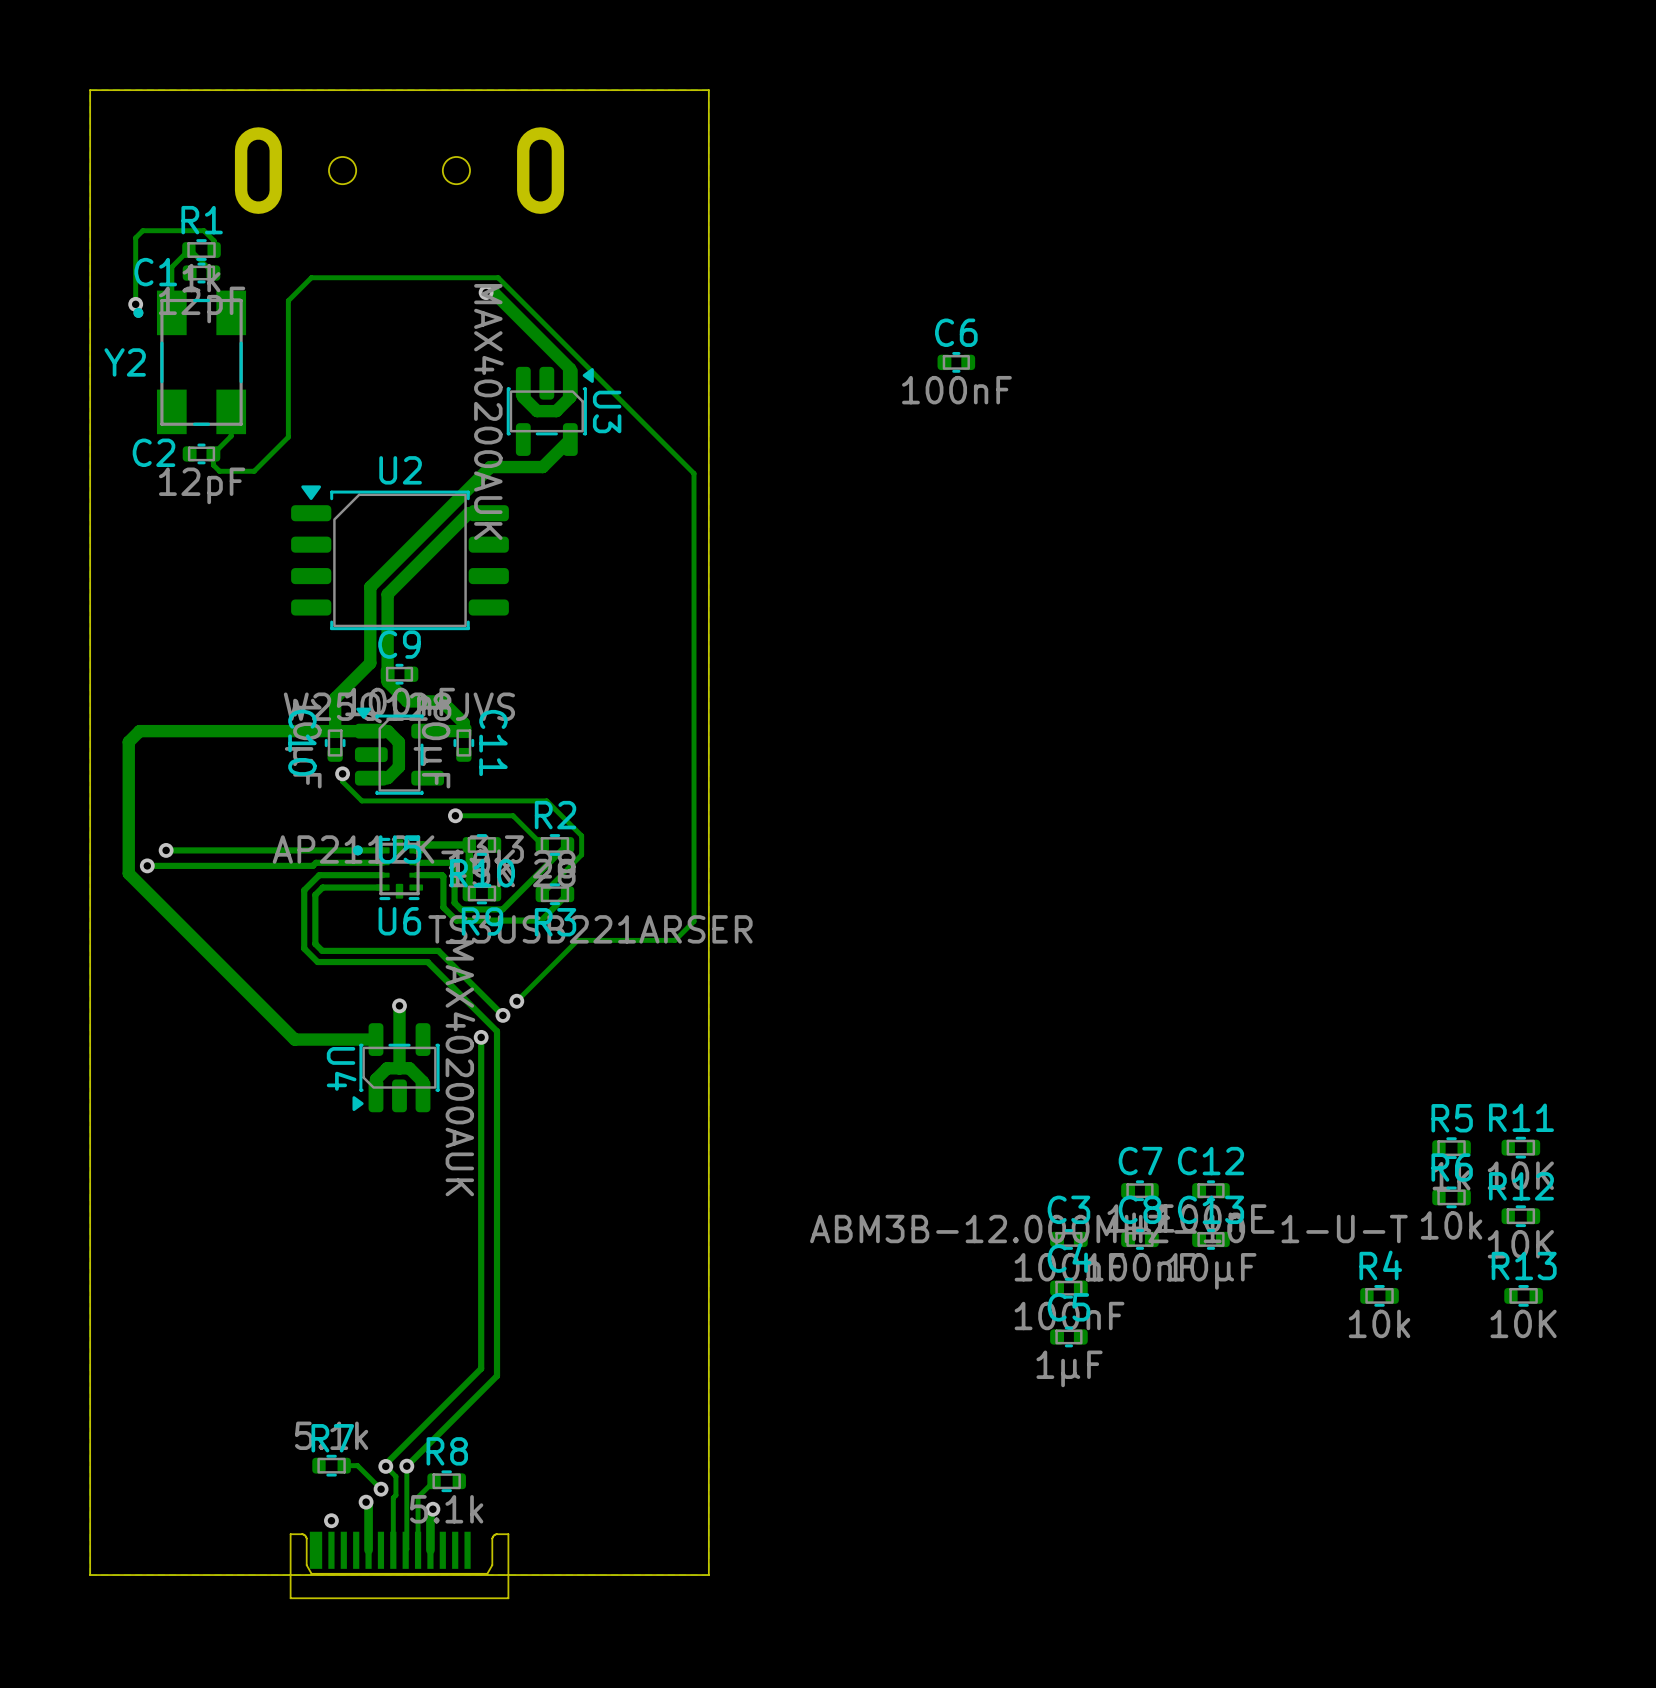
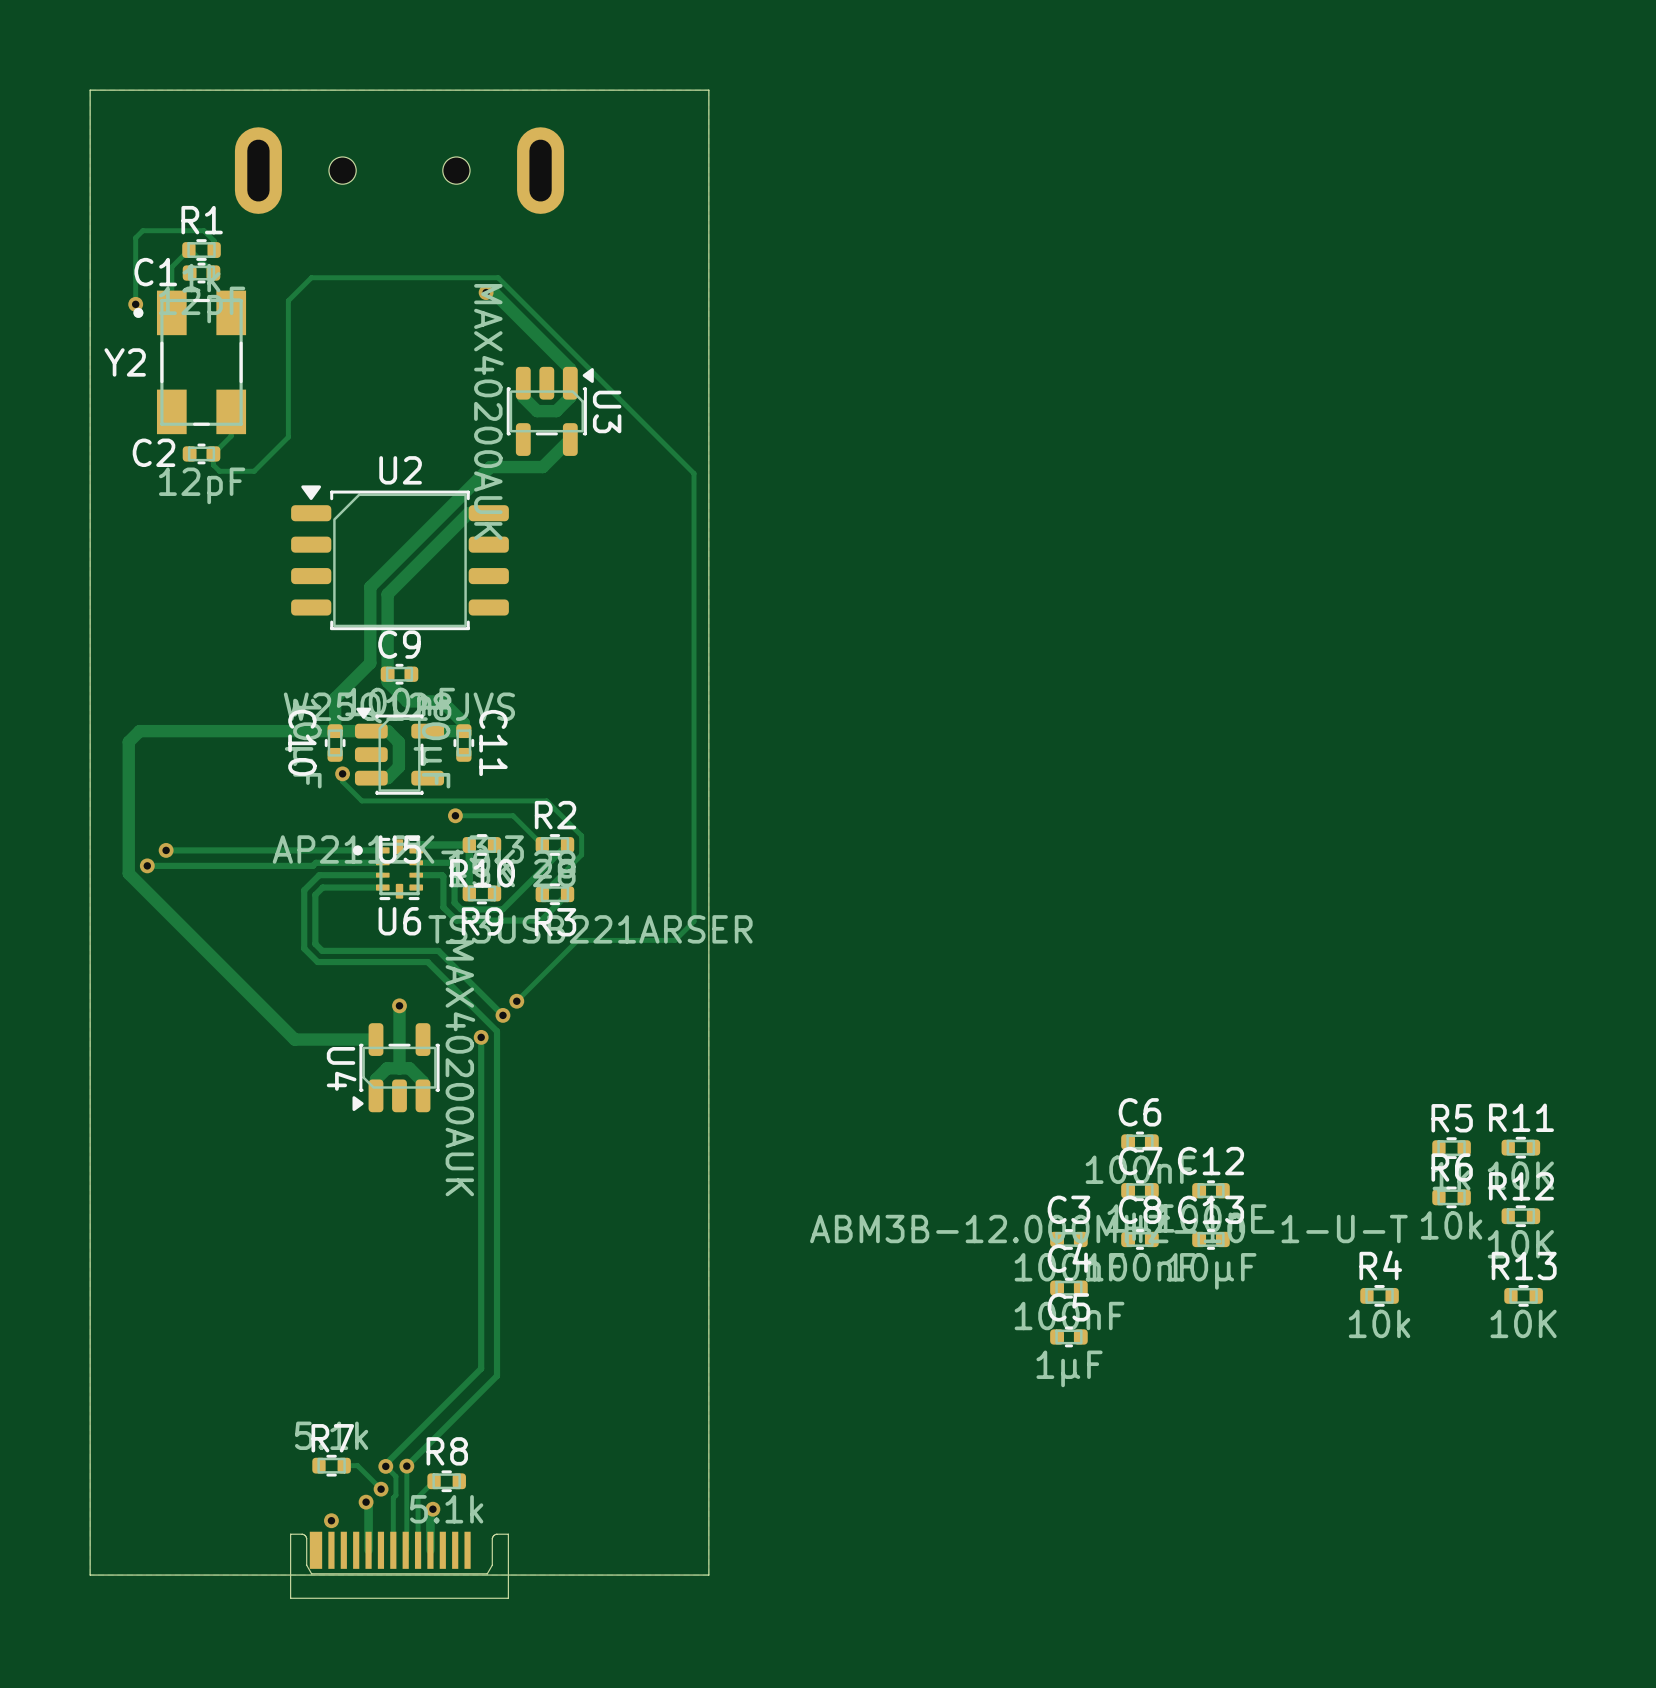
C6 position: (956, 362) -> (1139, 1141)

